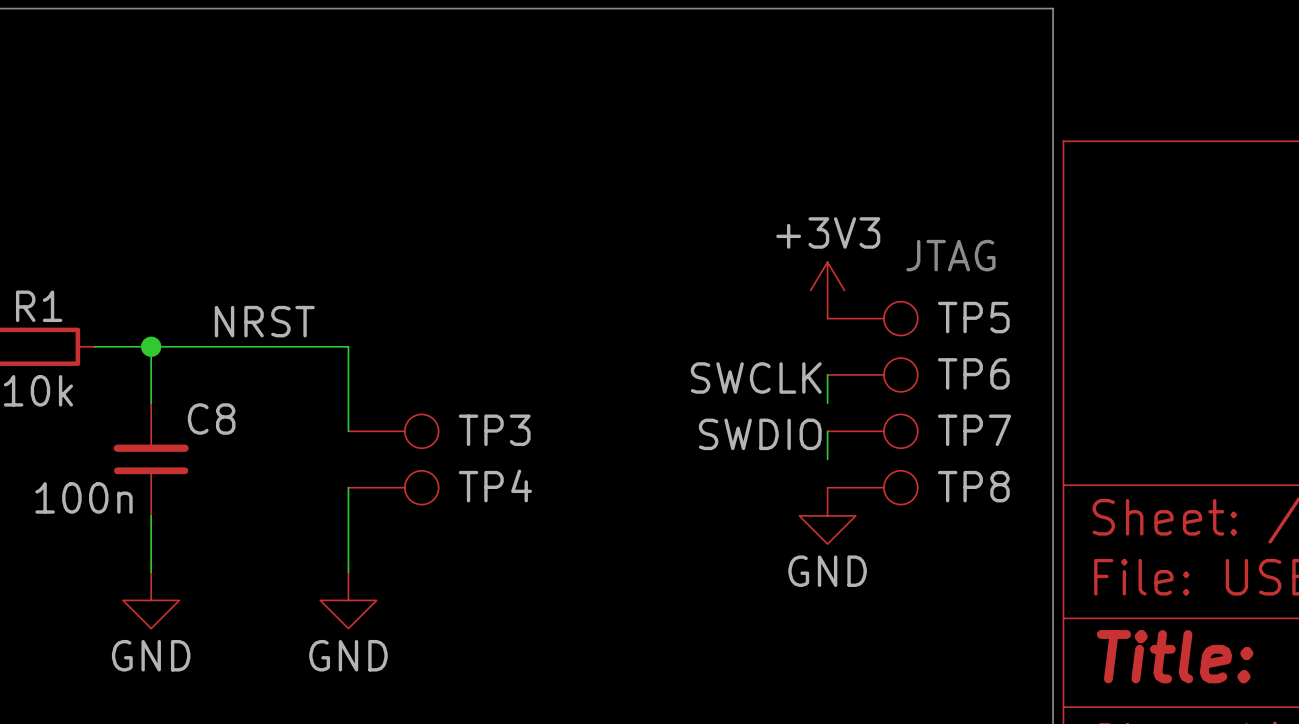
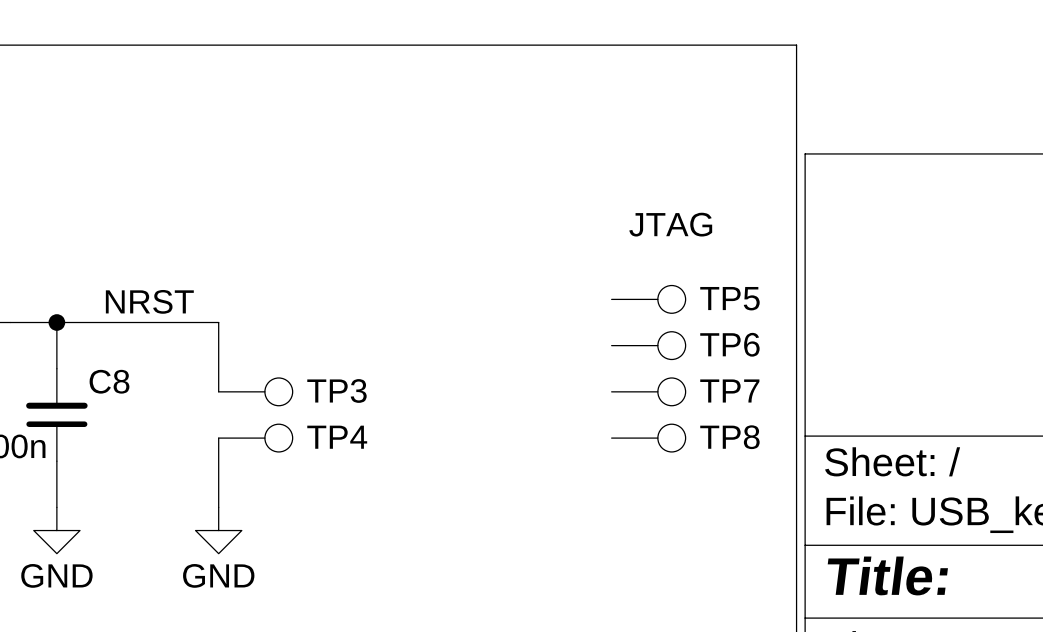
text position: JTAG (950, 255) -> JTAG (670, 224)
power symbol: +3V3 (827, 290) -> none
wire: (827, 374) (827, 403) -> none
label: SWCLK (756, 377) -> none
wire: (827, 431) (827, 459) -> none
label: SWDIO (760, 434) -> none
power symbol: GND (827, 515) -> none

